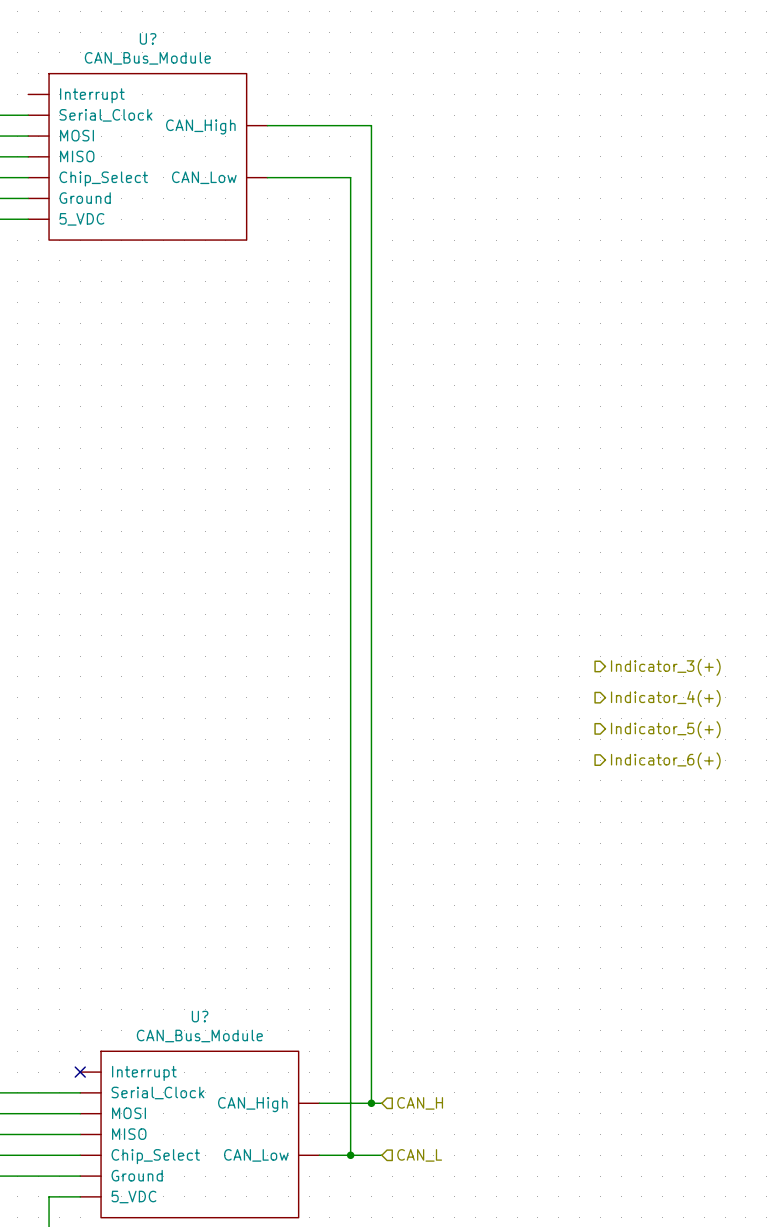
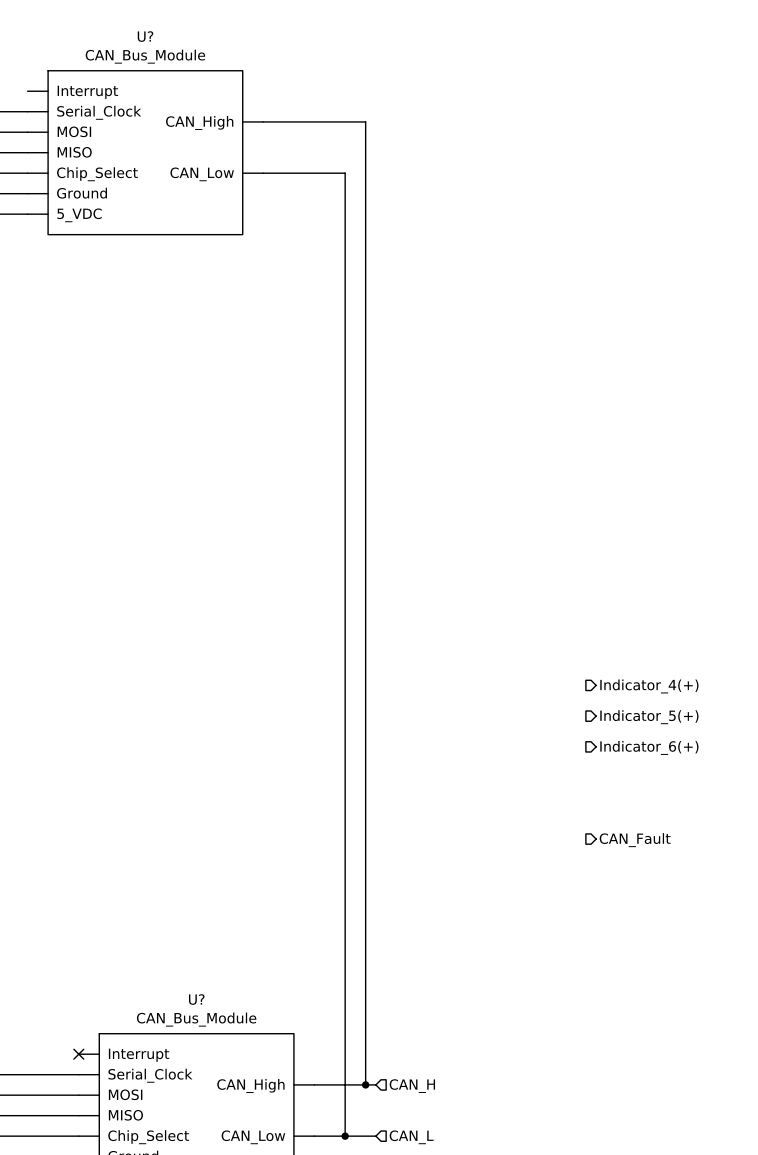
hierarchical label: Indicator_3(+) (665, 667) -> none
hierarchical label: none -> CAN_Fault (635, 840)

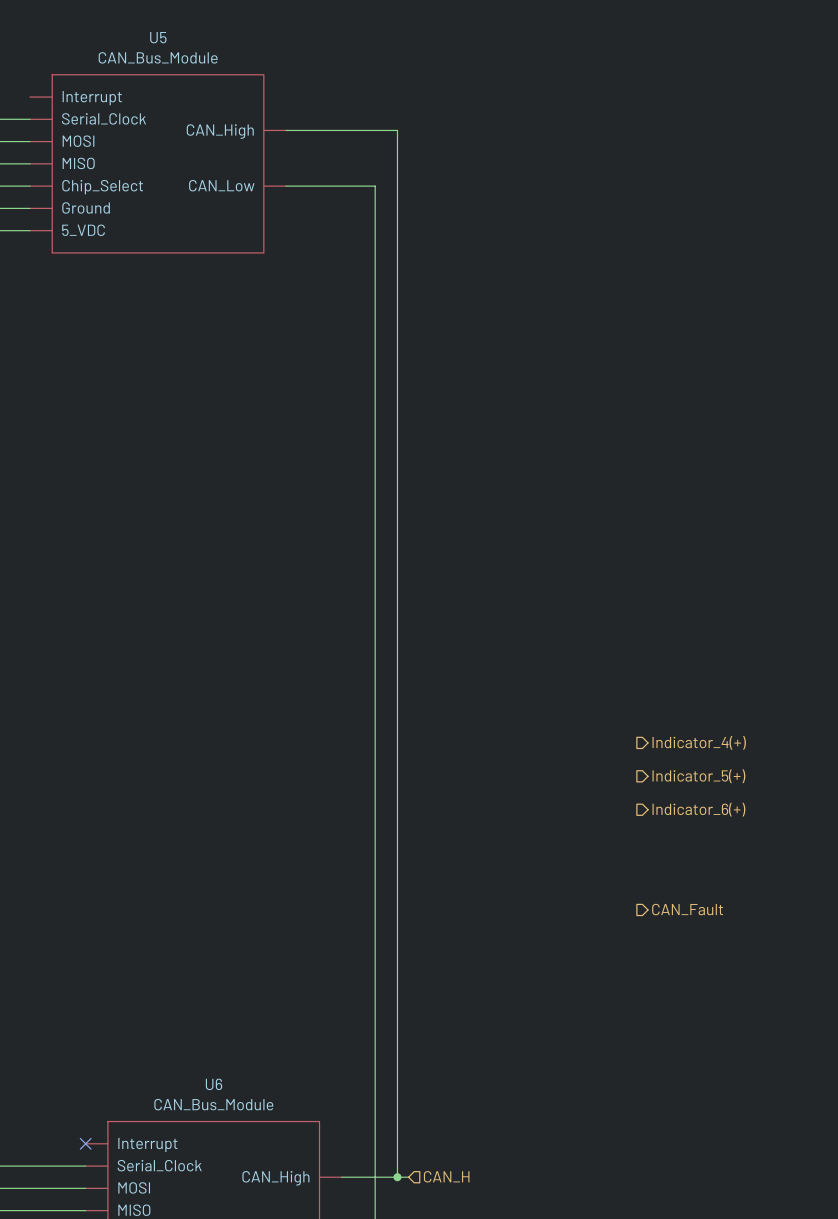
U? name: U? (145, 36) -> U5 (158, 37)
U? name: U? (196, 999) -> U6 (214, 1084)

